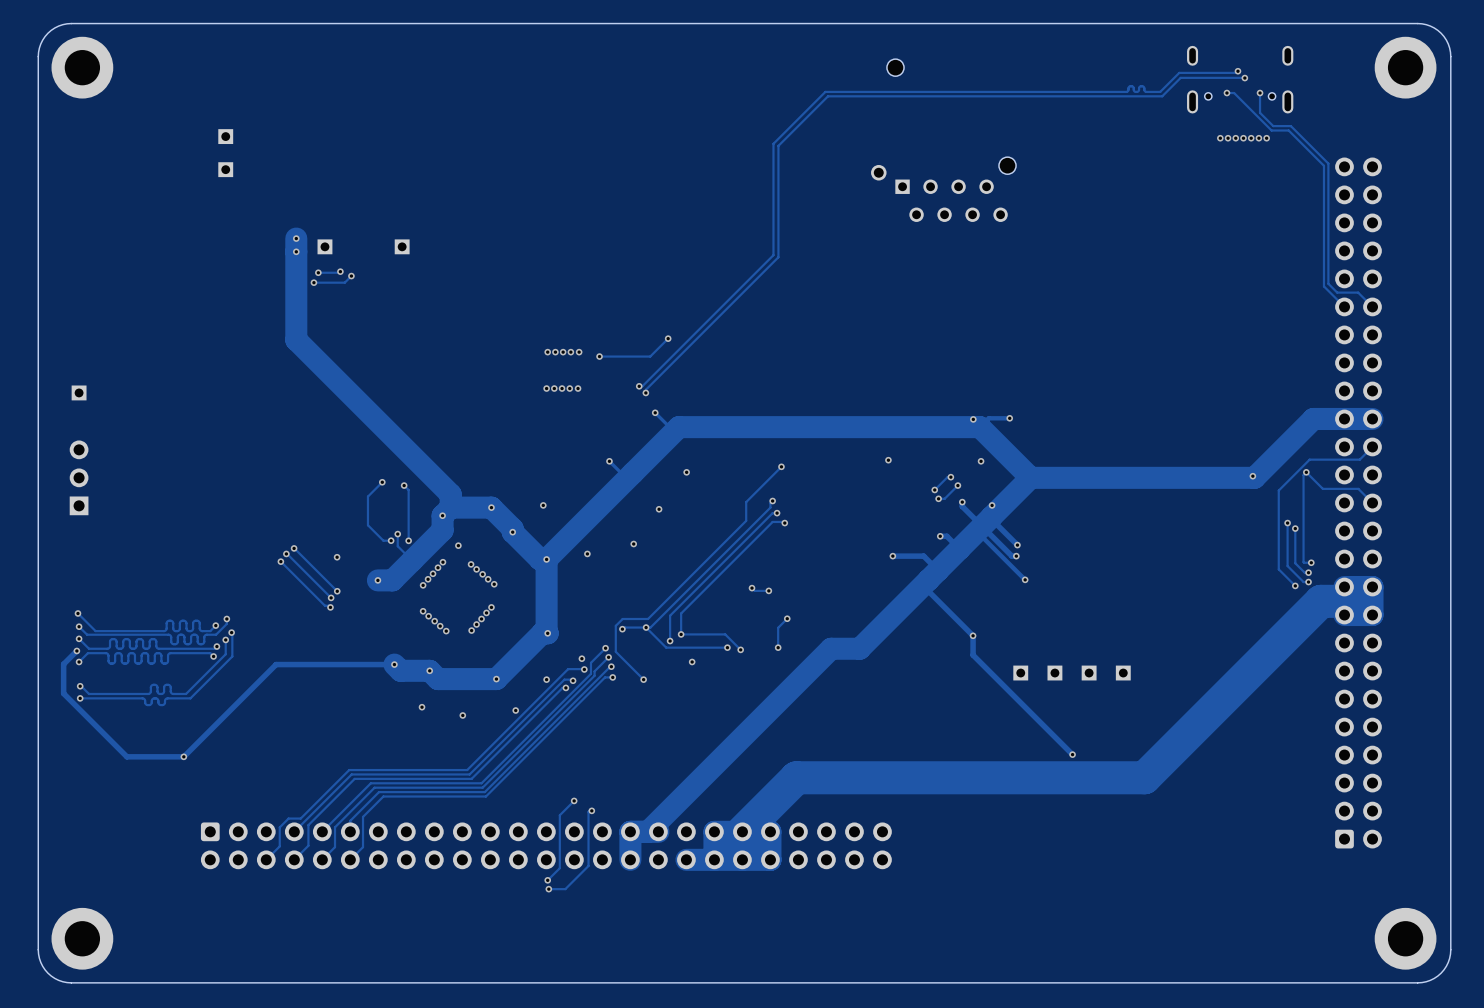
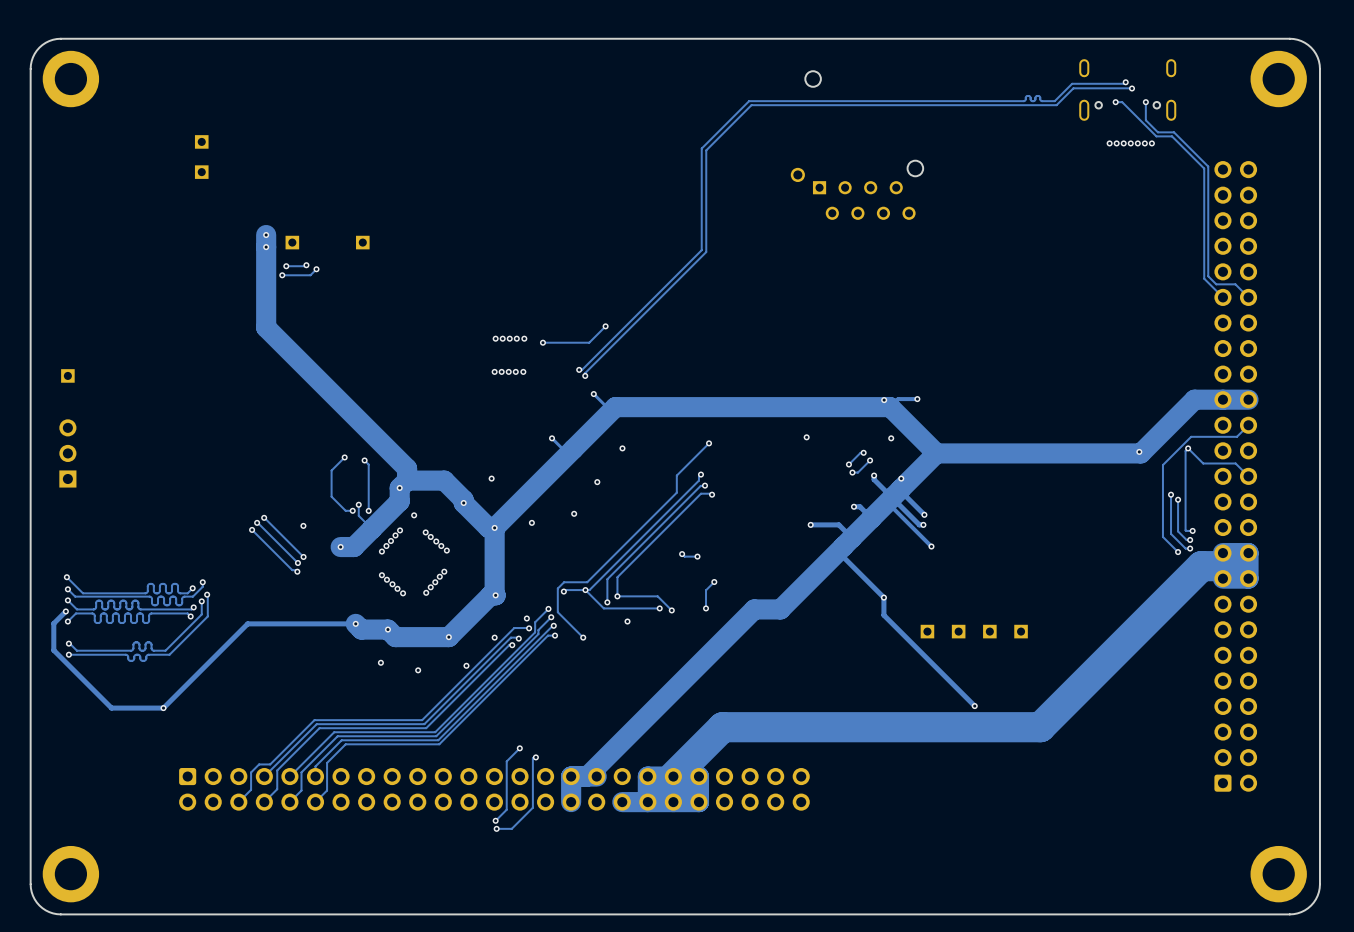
via: (491, 507) -> none

